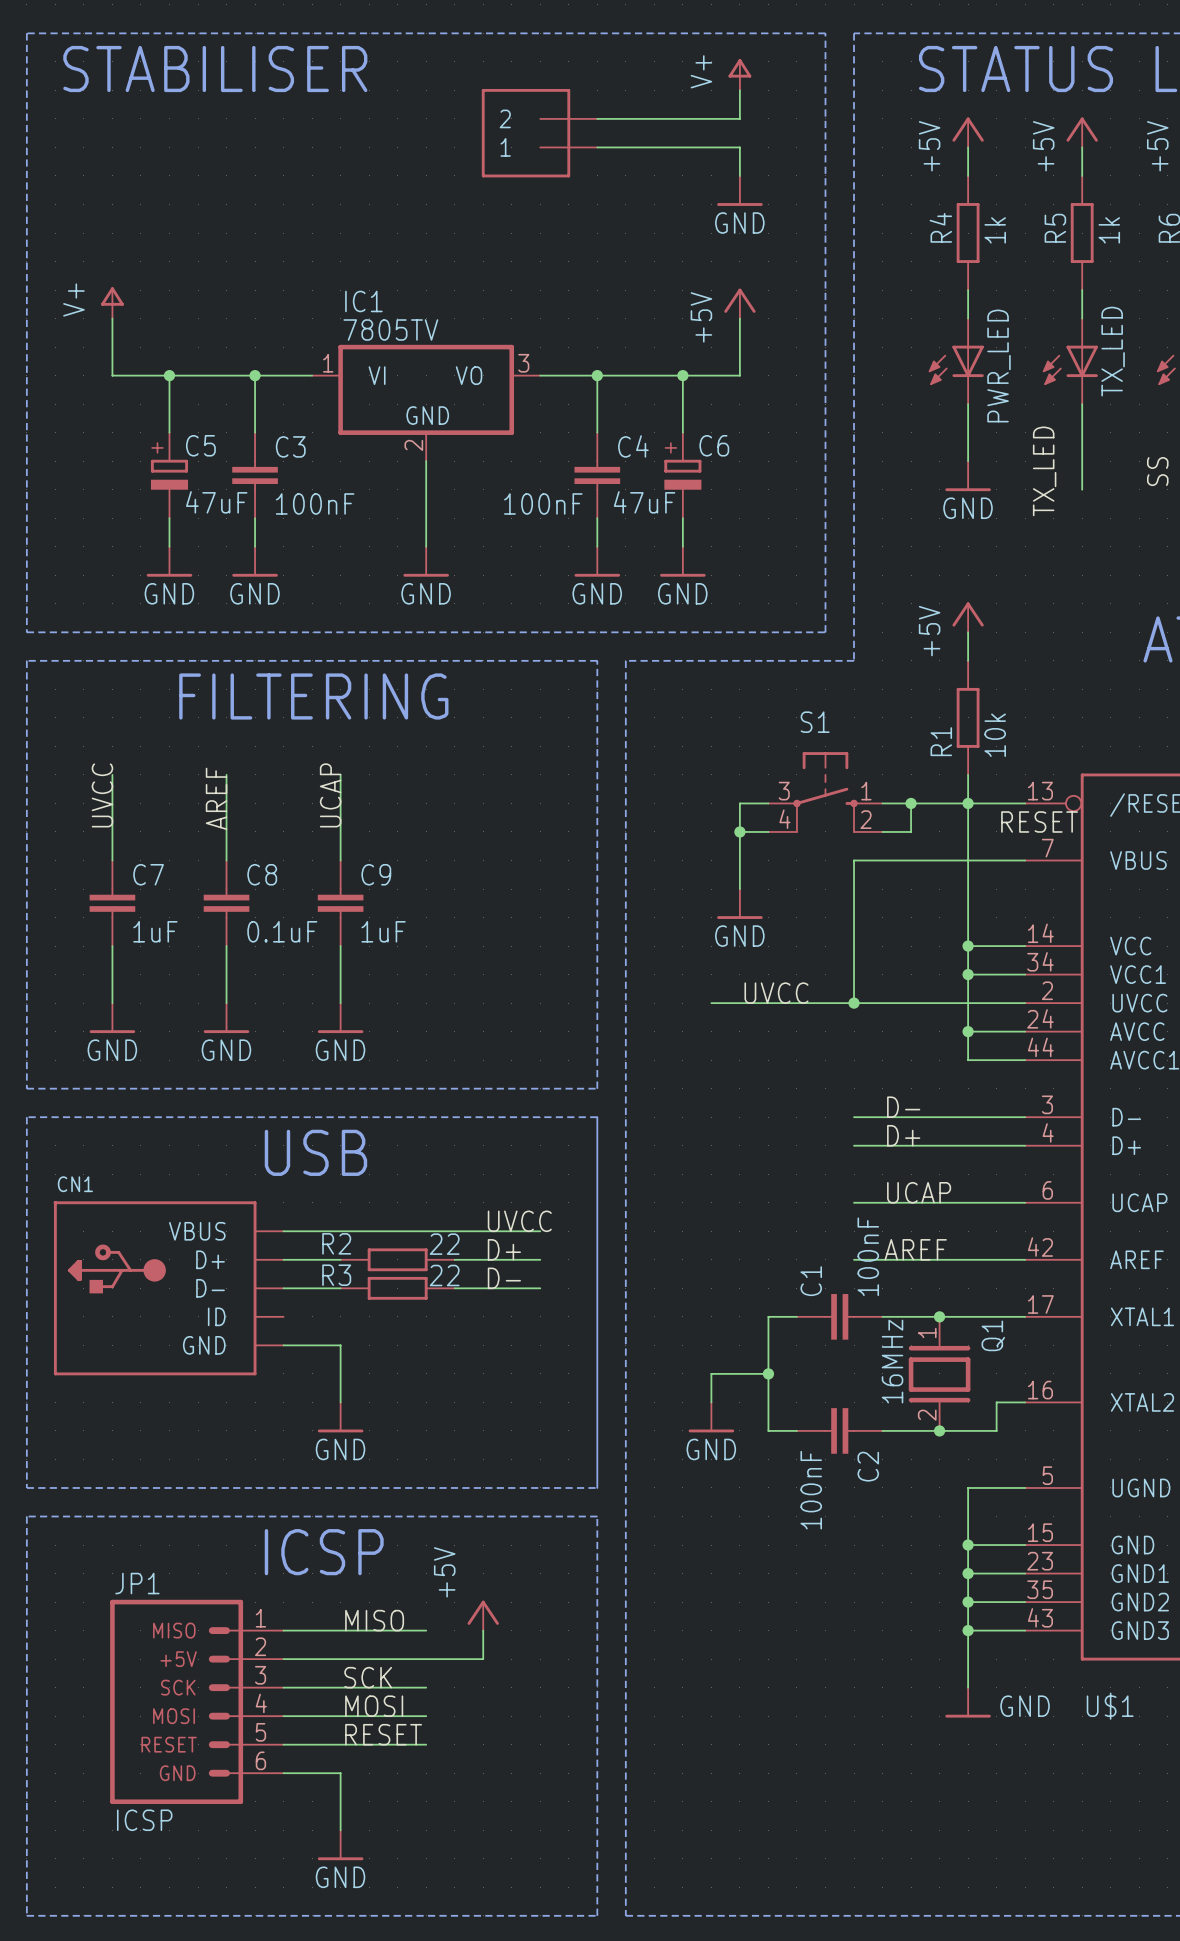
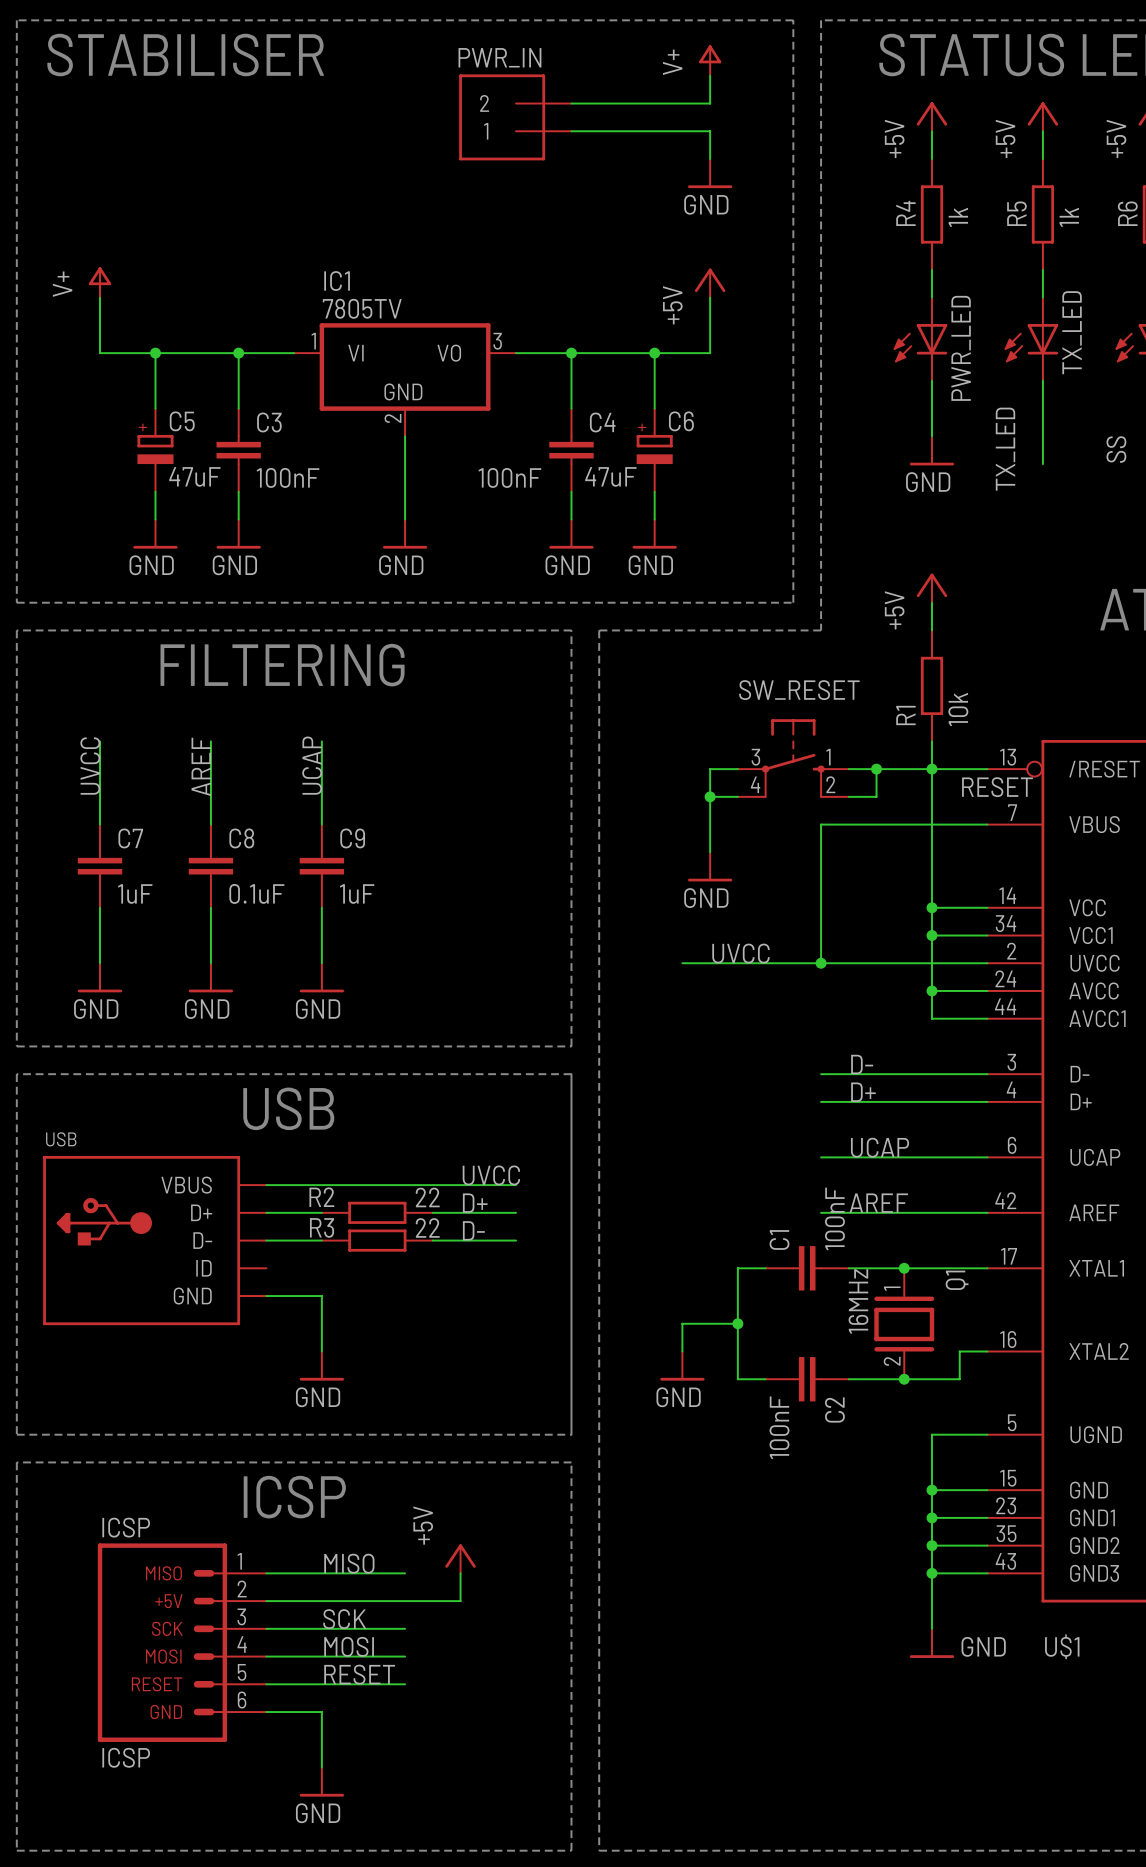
PWR_IN name: none -> PWR_IN (499, 57)
S1 name: S1 (815, 722) -> SW_RESET (799, 690)
CN1 name: CN1 (75, 1184) -> USB (61, 1139)
JP1 name: JP1 (137, 1583) -> ICSP (126, 1527)

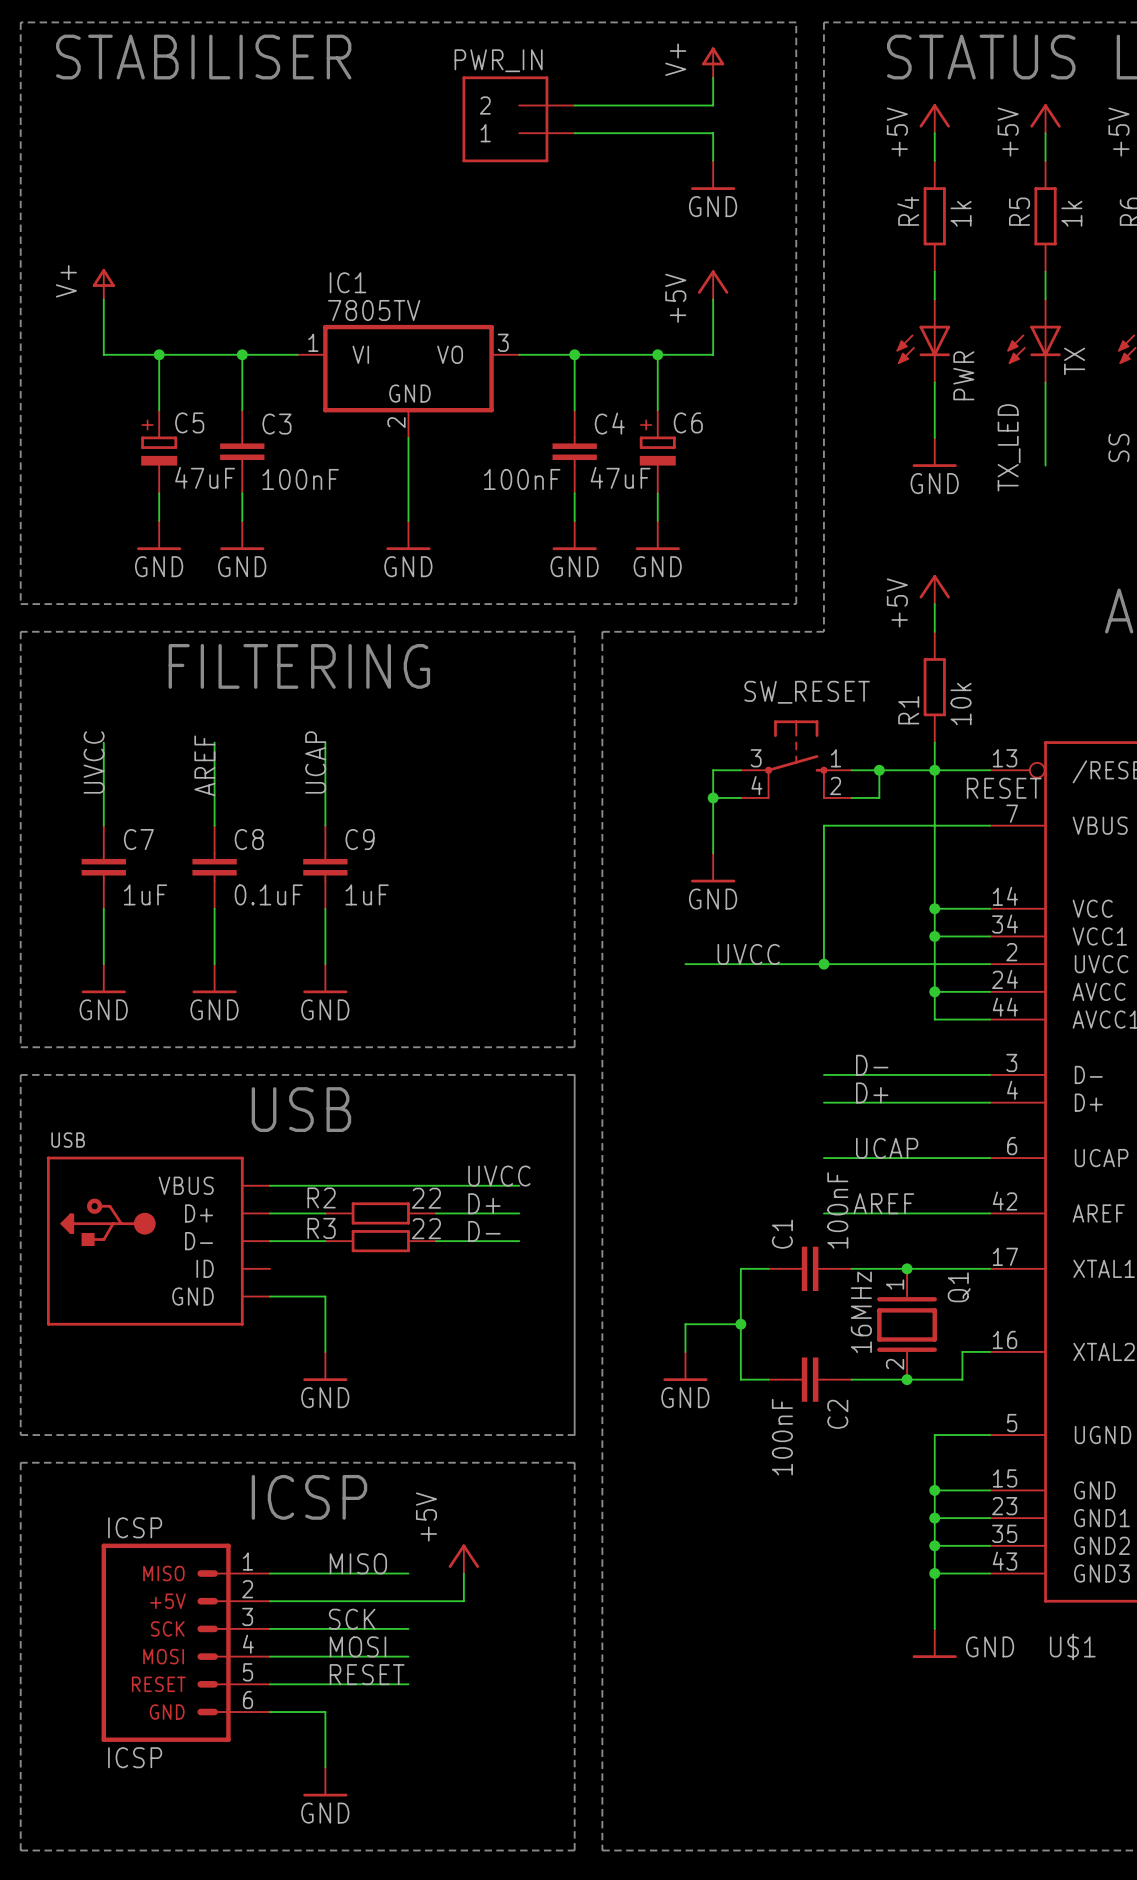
TX_LED name: TX_LED (1072, 332) -> TX (1074, 361)
PWR_LED name: PWR_LED (961, 348) -> PWR (963, 375)

